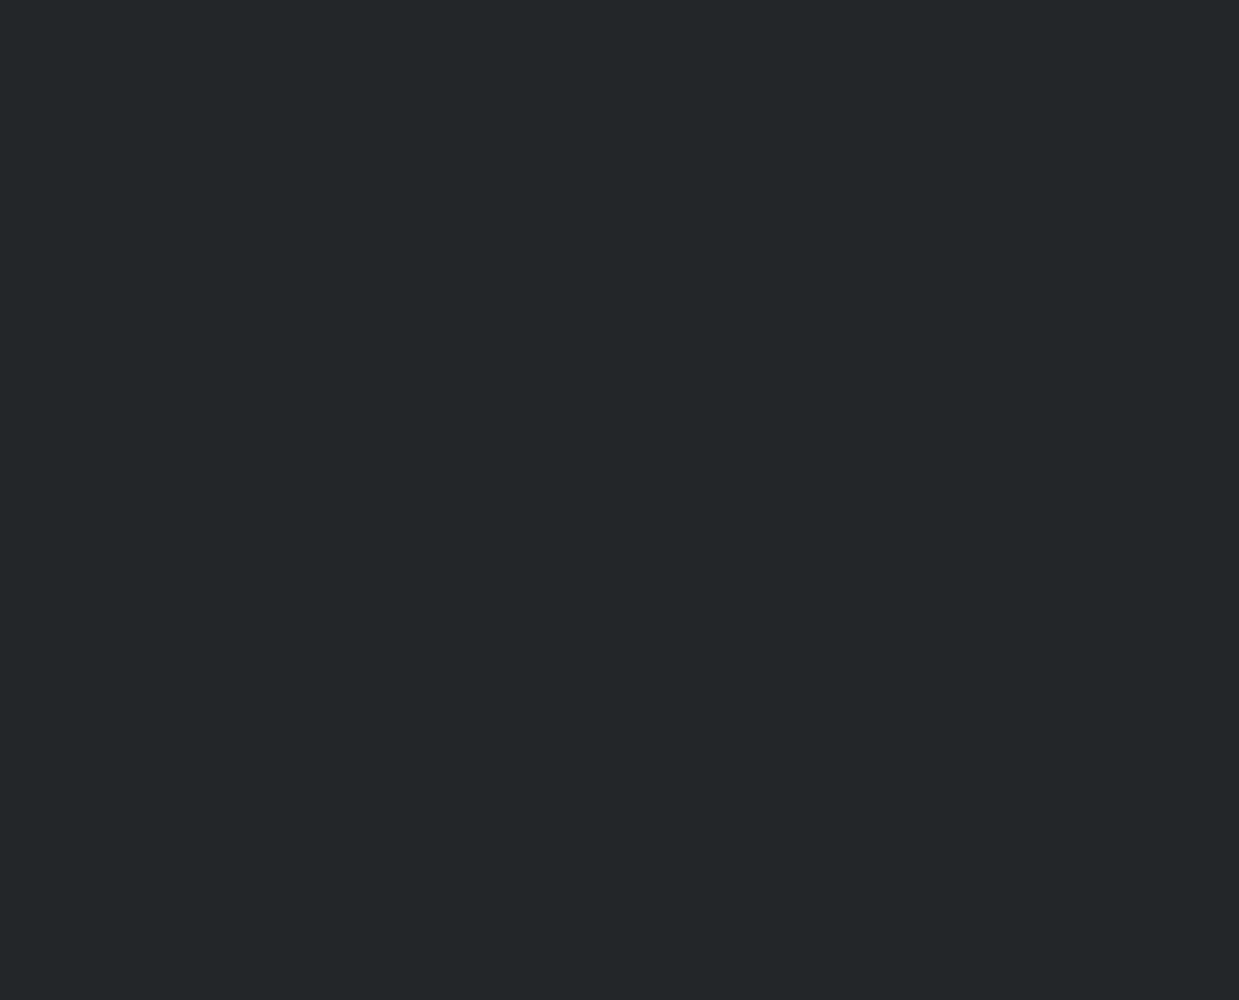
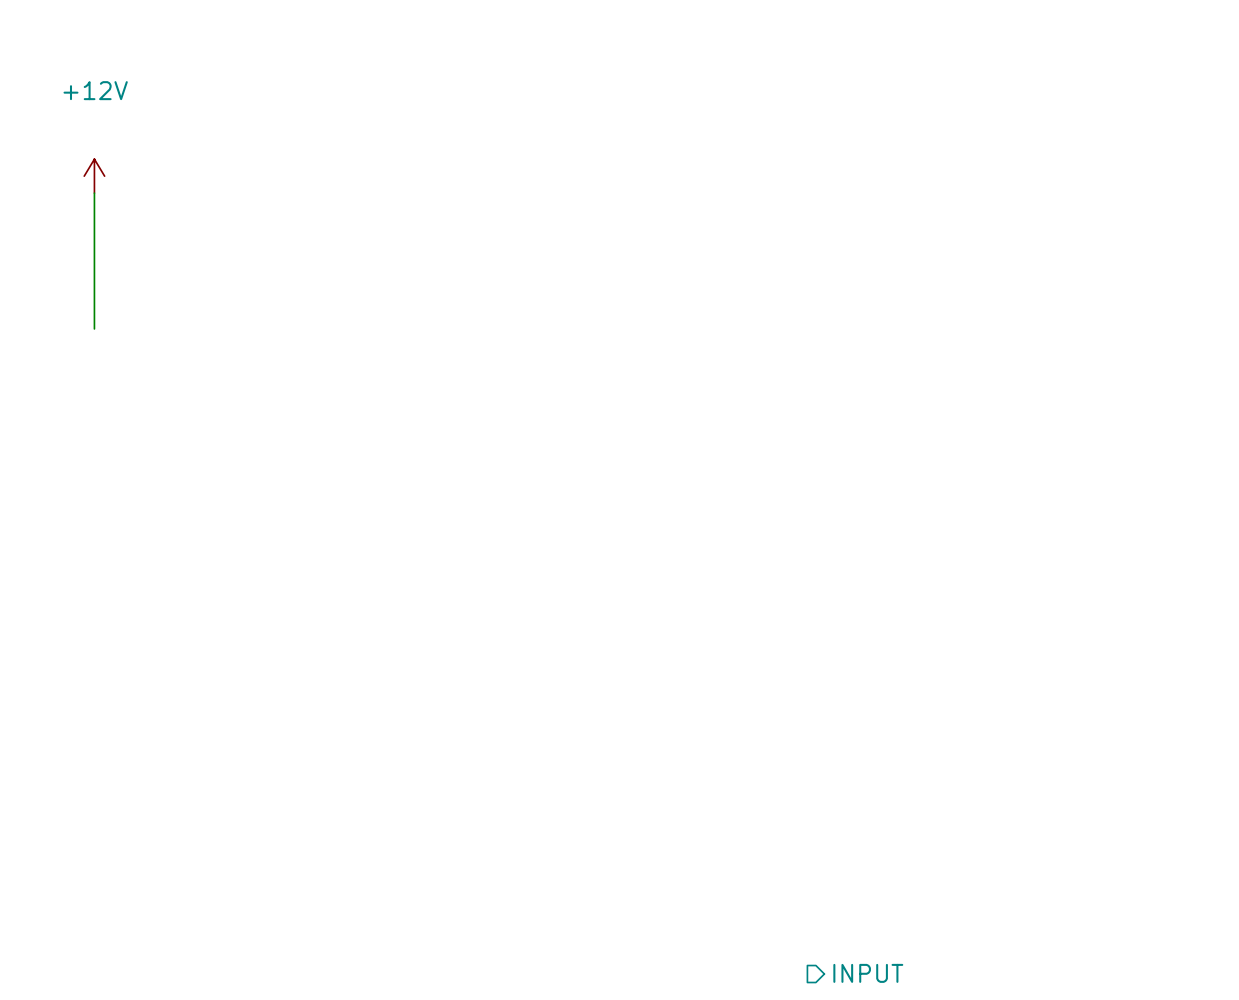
power symbol: none -> +12V (94, 176)
wire: none -> (94, 193) (94, 328)
sheet pin: none -> INPUT (868, 973)

